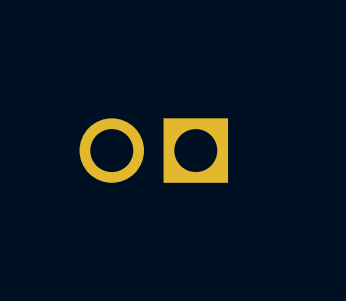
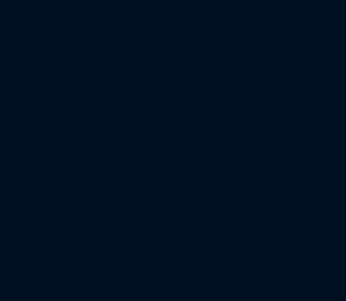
part: (153, 150) -> none

